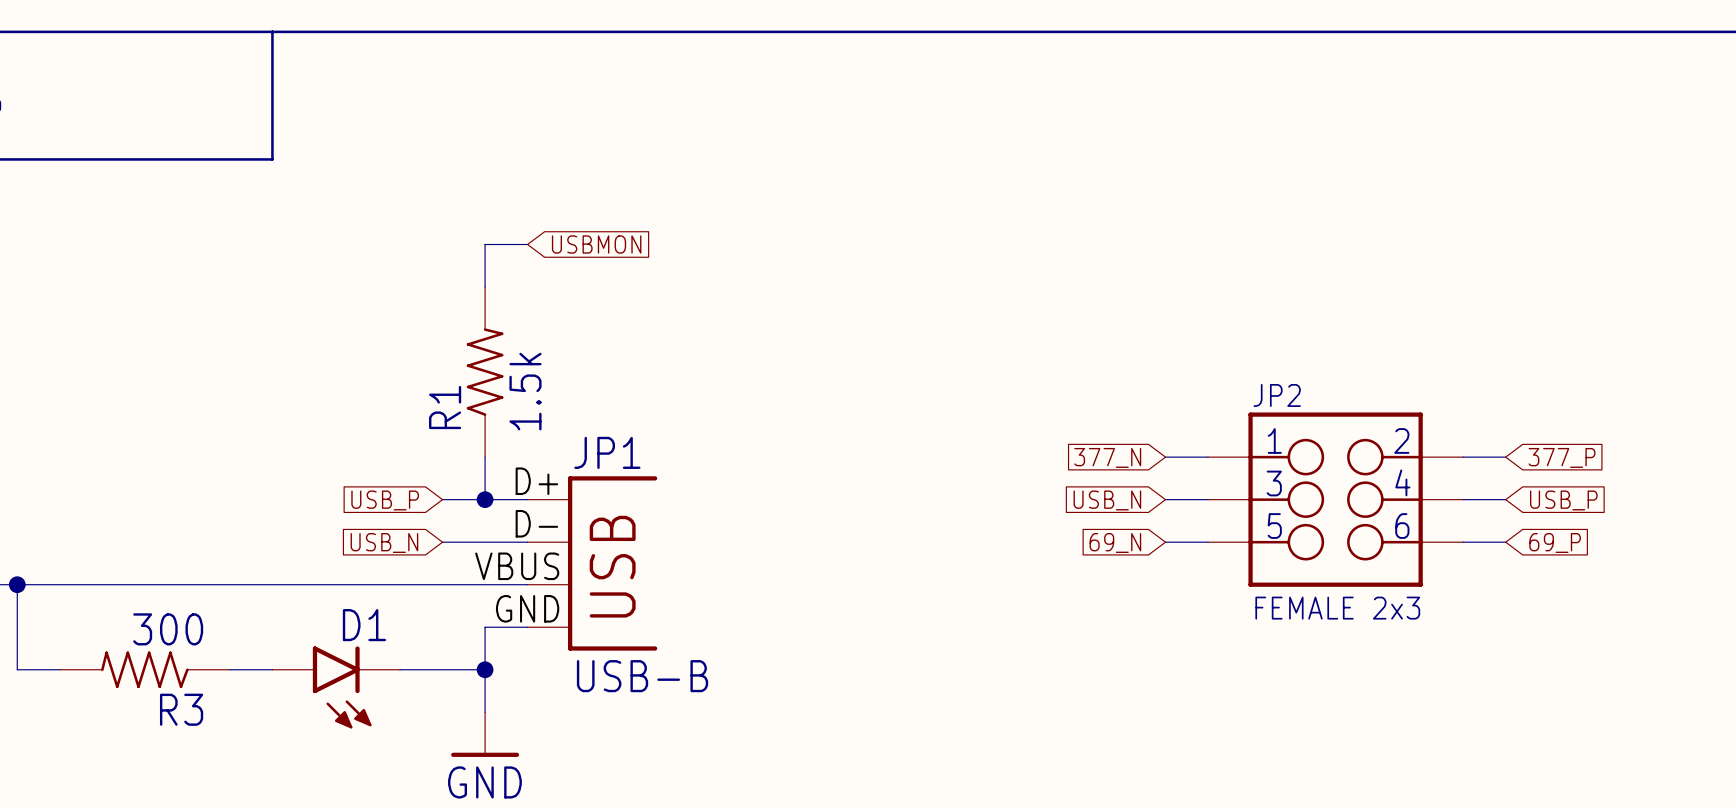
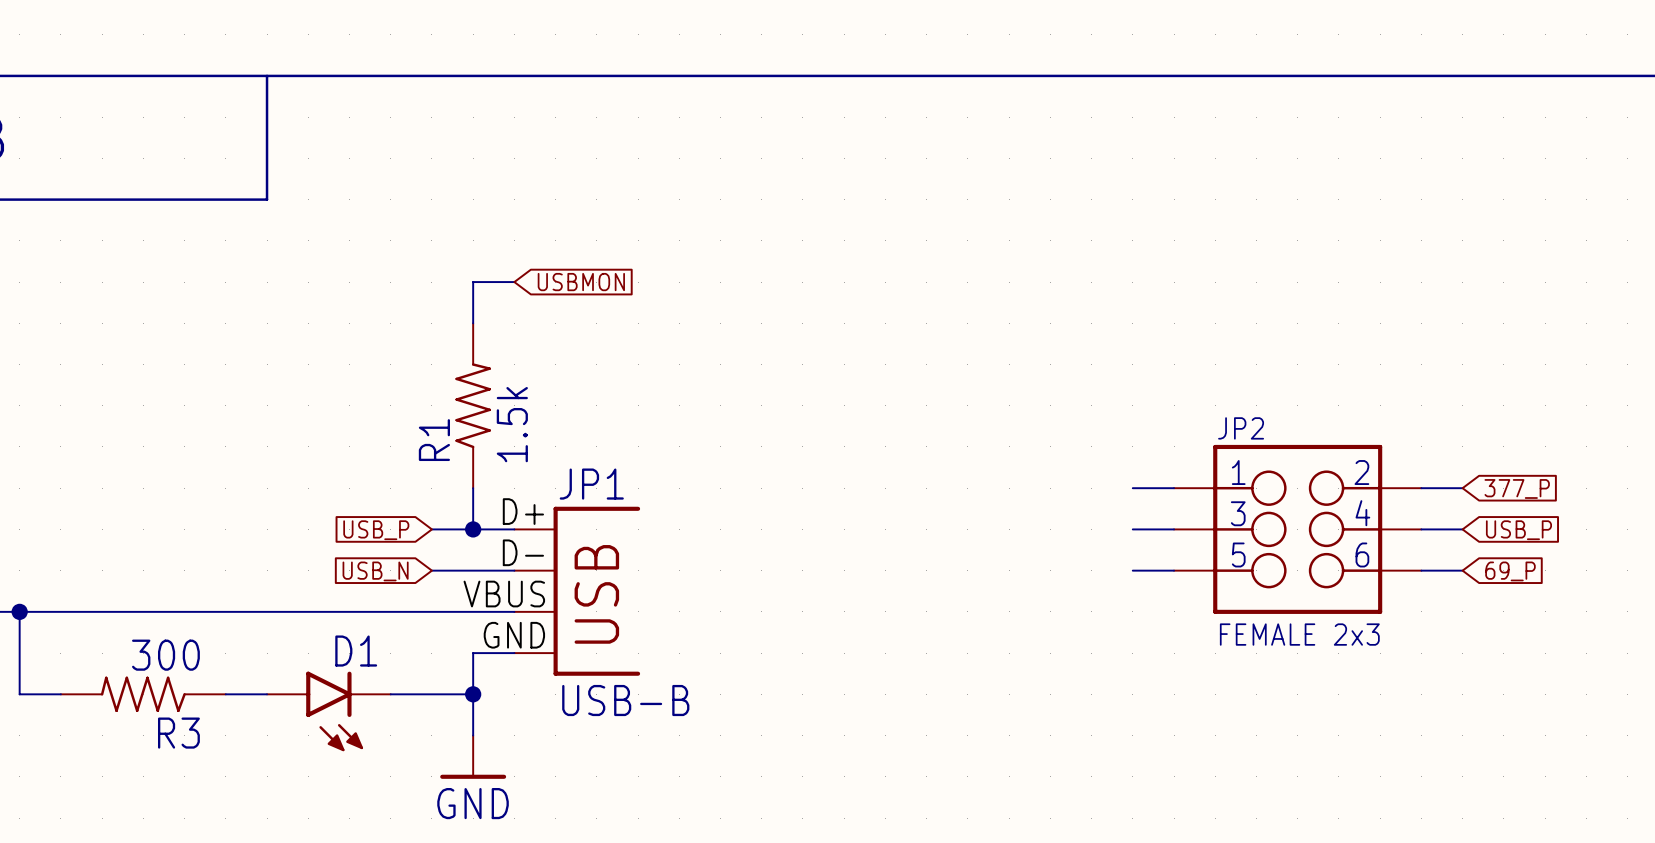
global label: 377_N (1107, 457) -> none
global label: USB_N (1107, 500) -> none
global label: 69_N (1115, 542) -> none

